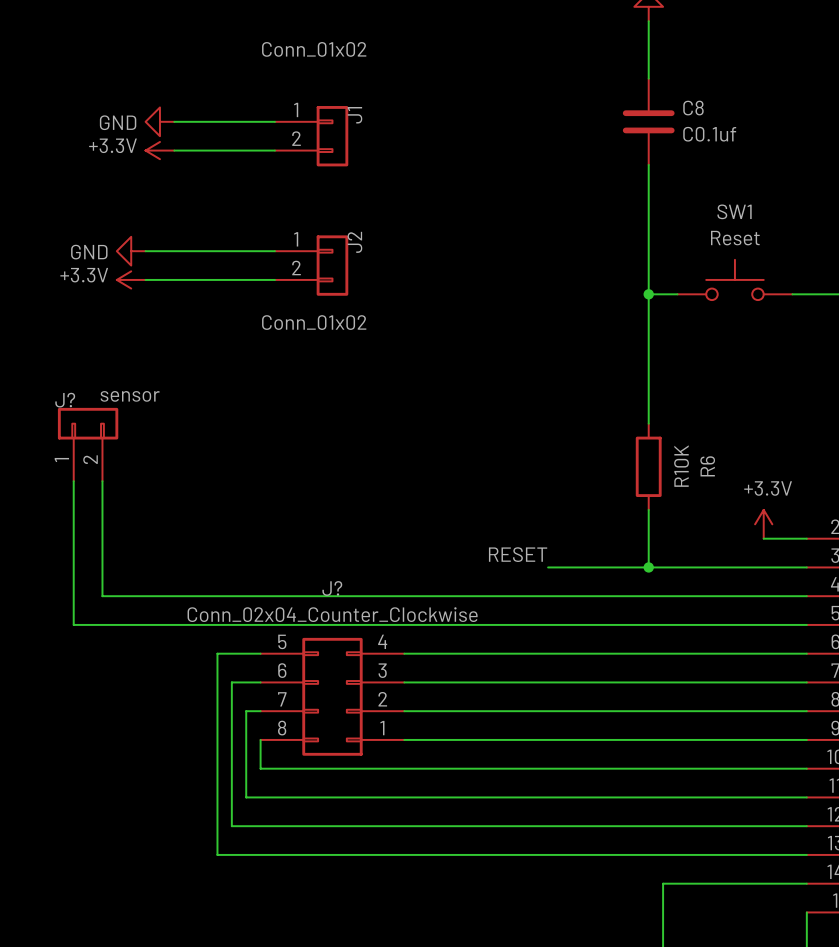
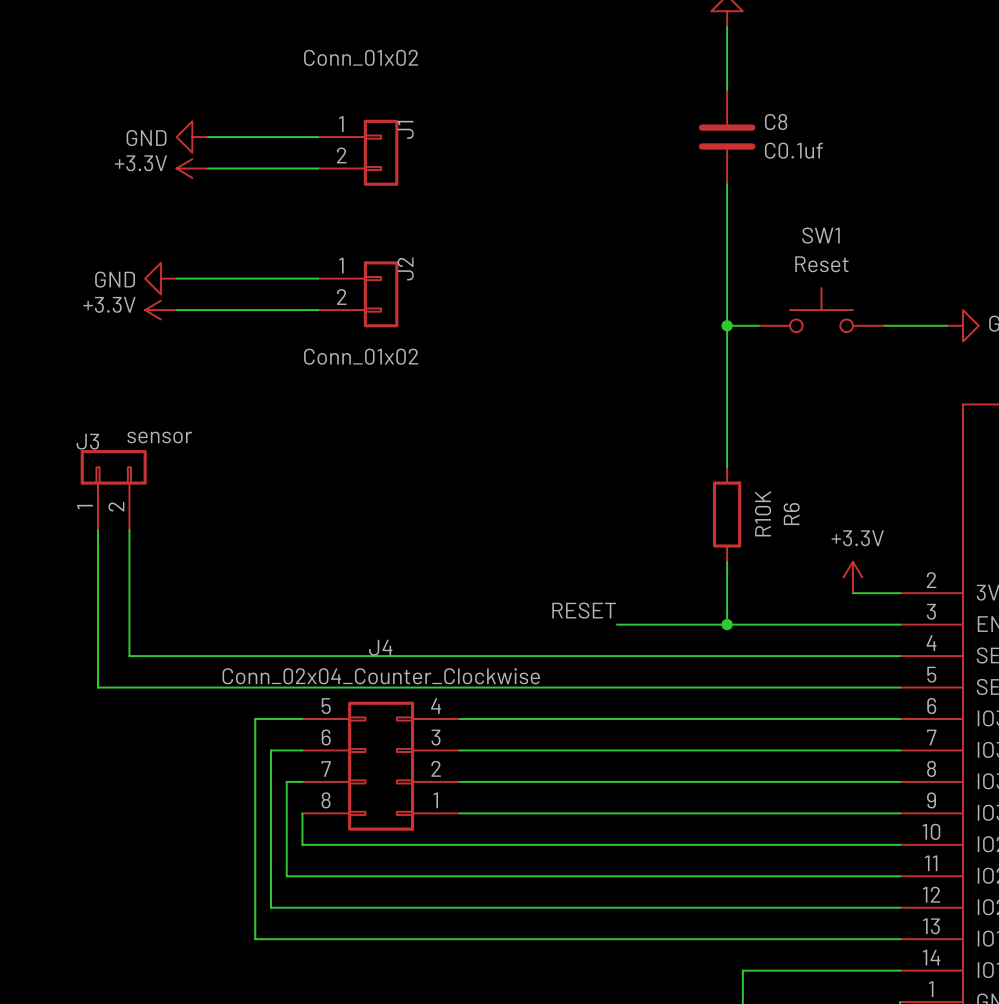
J? name: J? (65, 400) -> J3 (87, 441)
J? name: J? (332, 588) -> J4 (380, 647)

